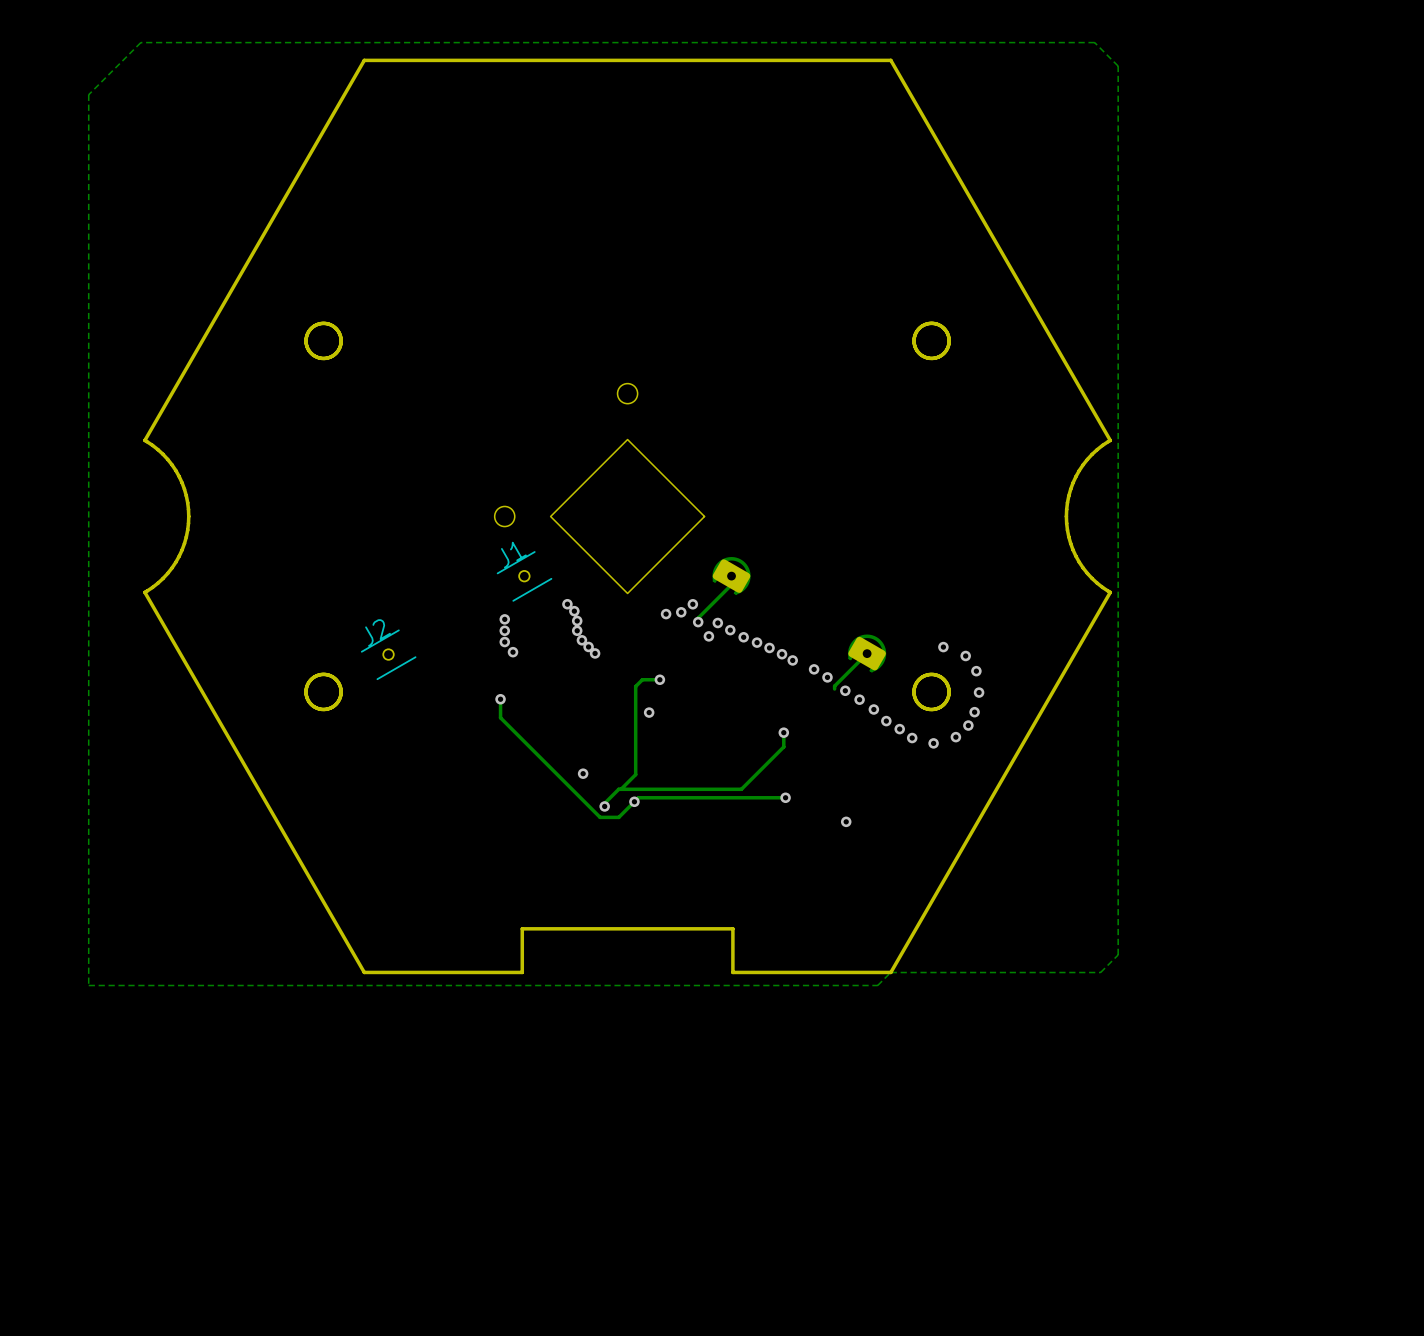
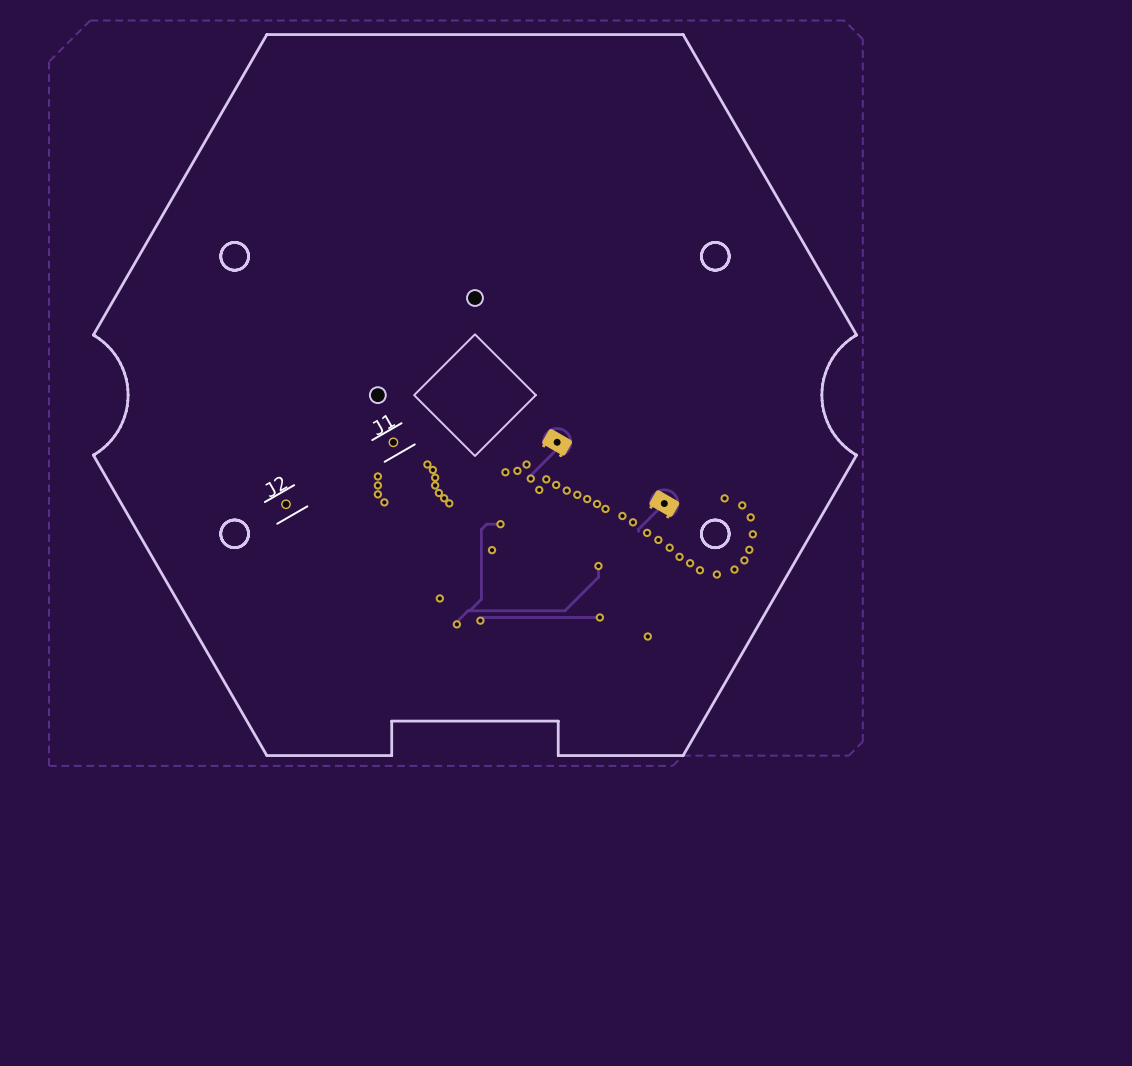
track: (500, 699) (500, 717) (600, 817) (618, 817) (634, 801) -> none
via: (500, 699) -> none

